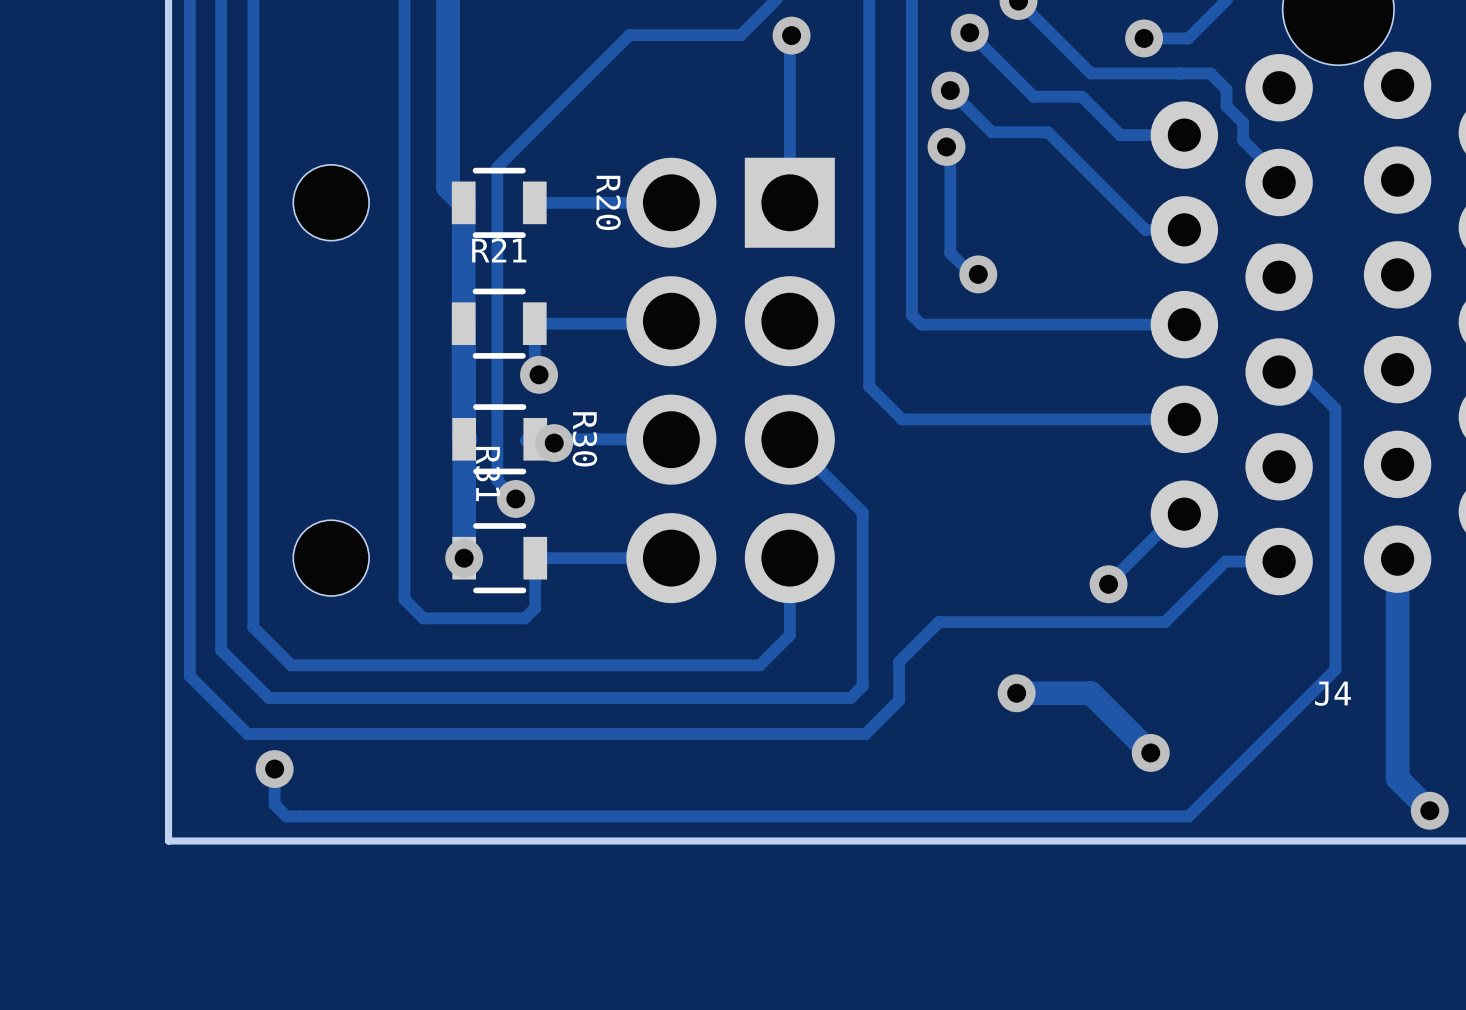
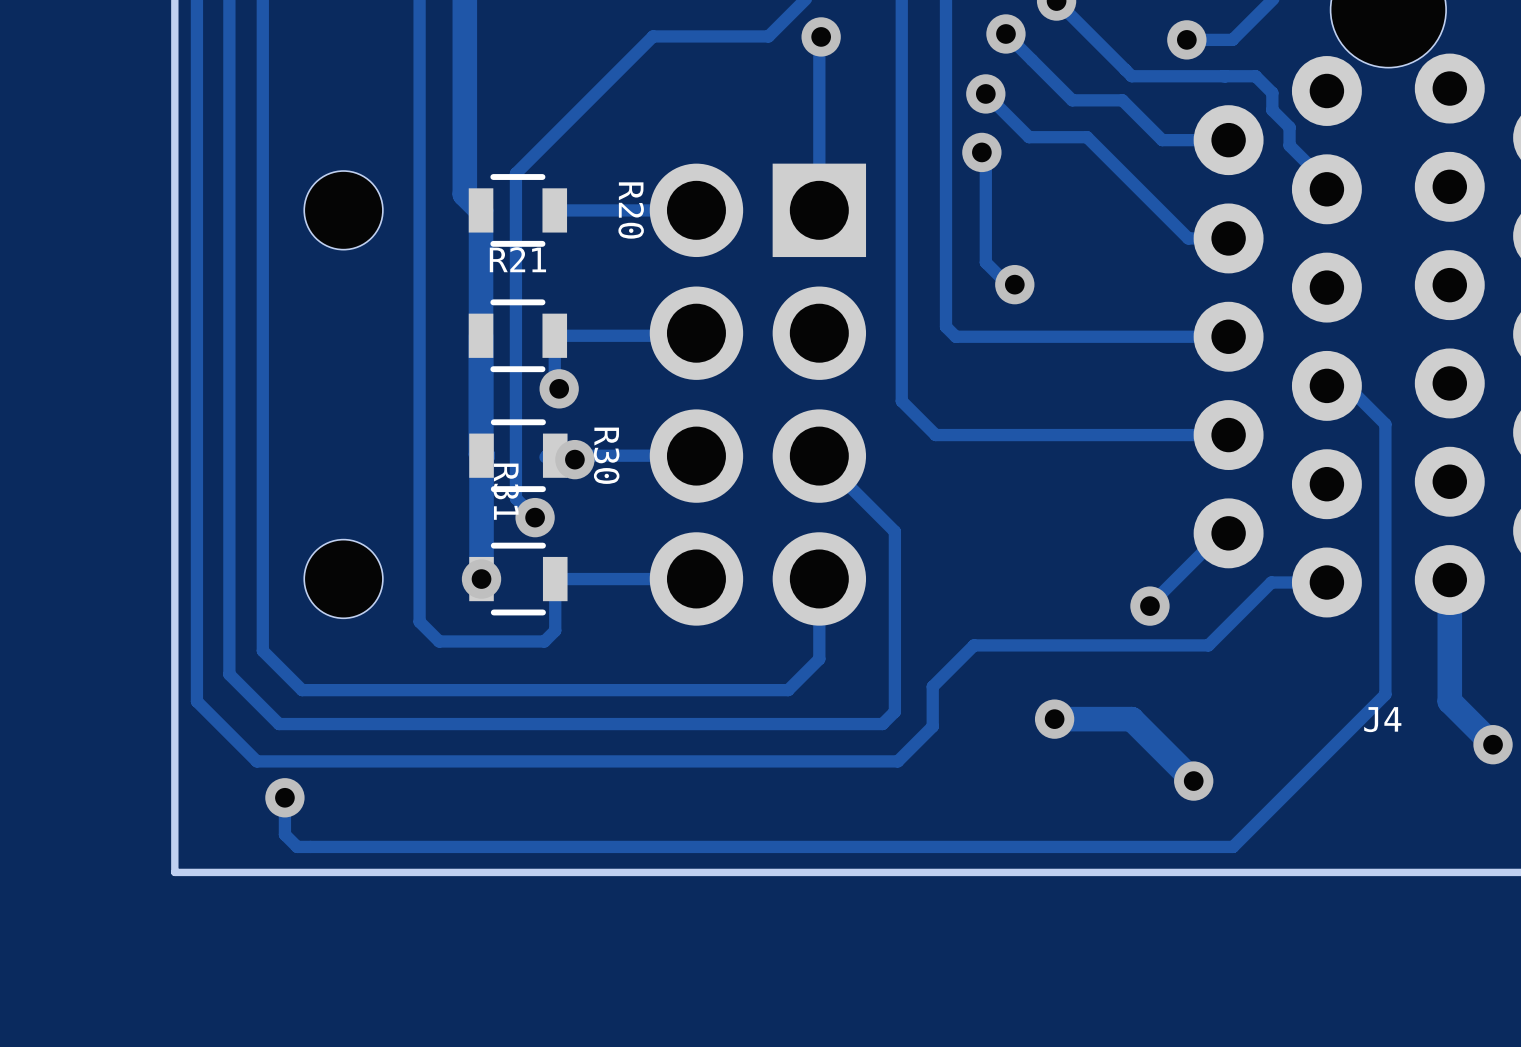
track: (1397, 676) (1397, 778) (1429, 810) -> (1449, 701) (1493, 744)
via position: (1429, 810) -> (1493, 744)

